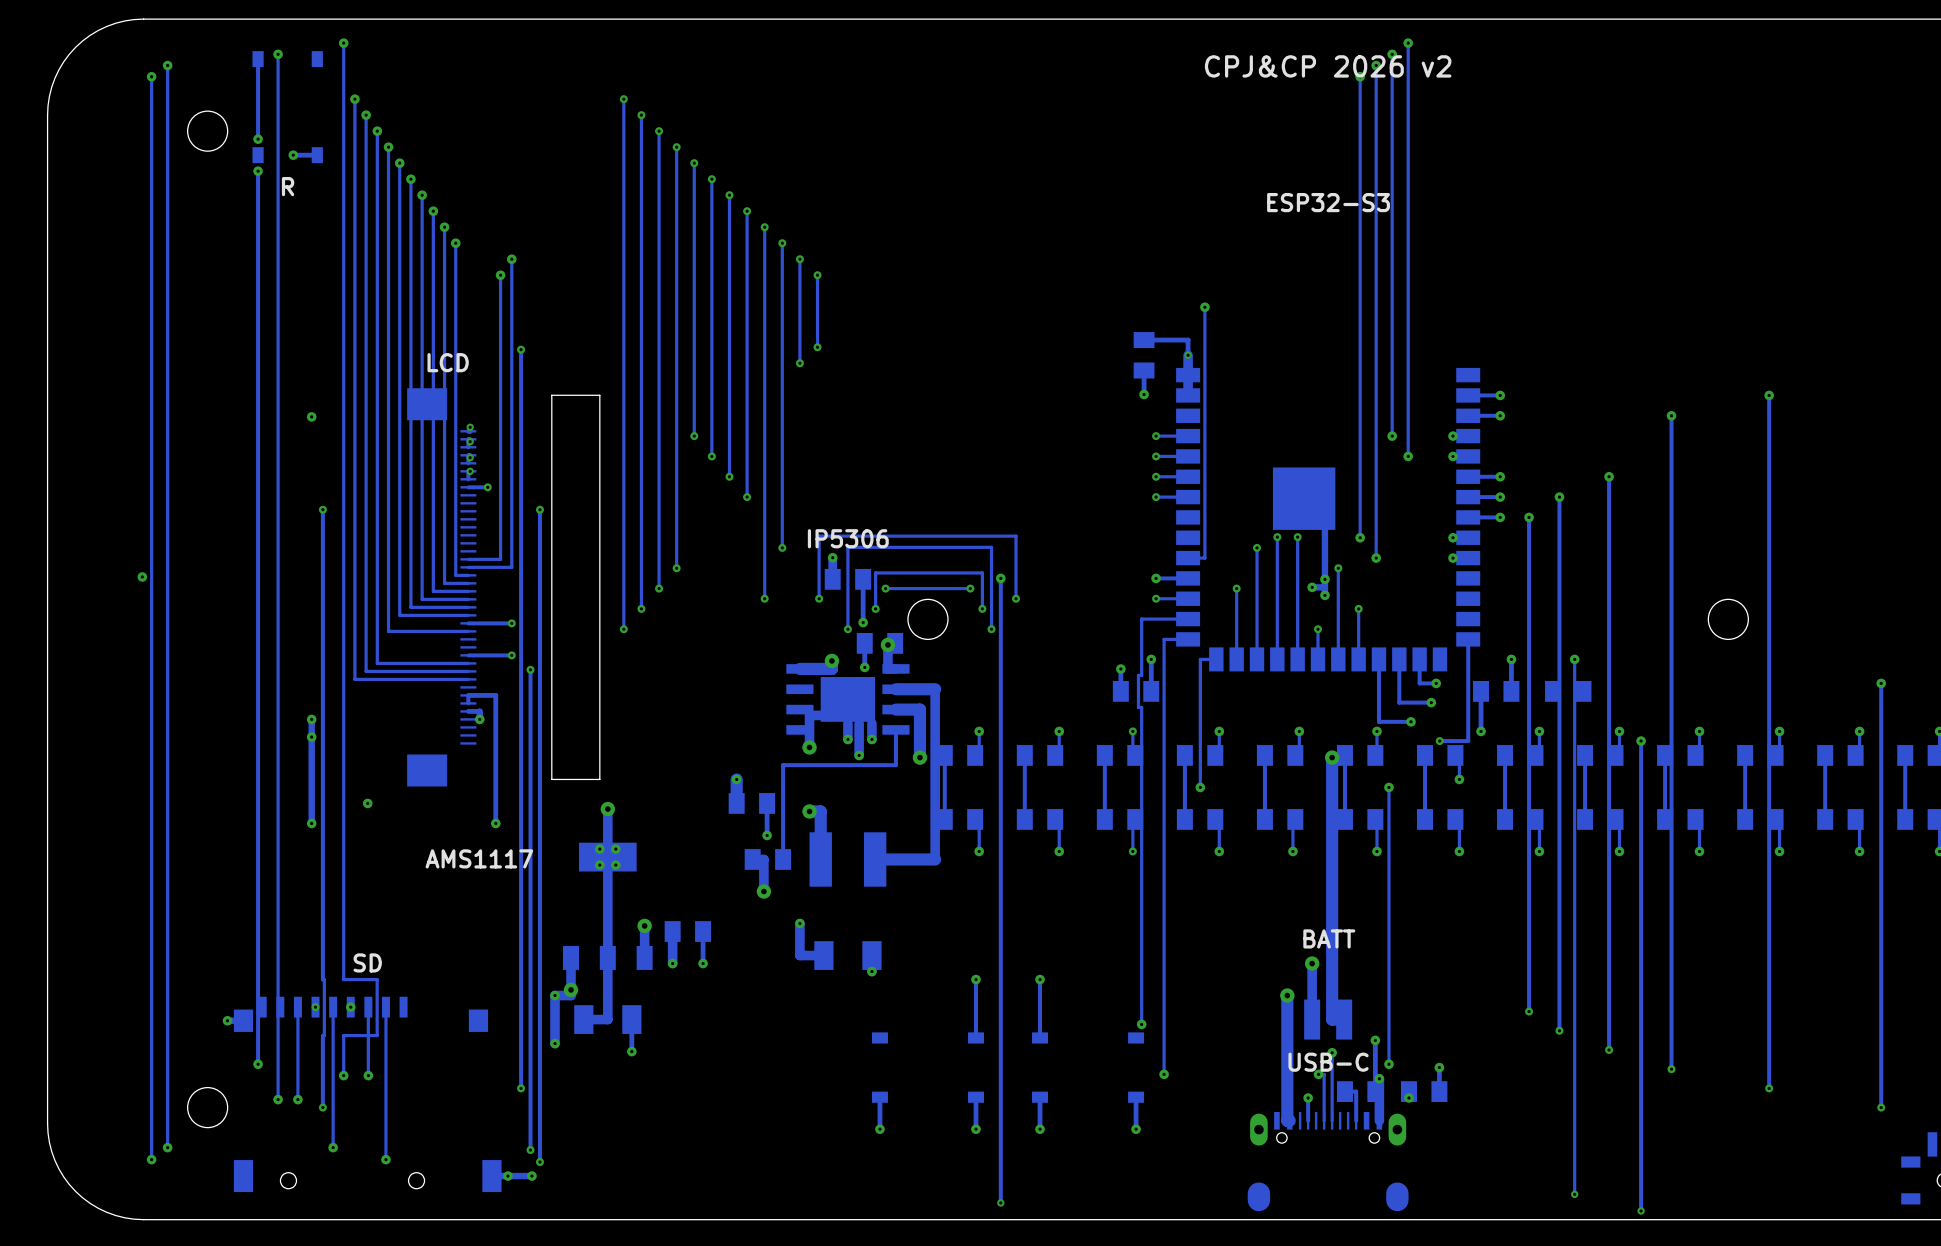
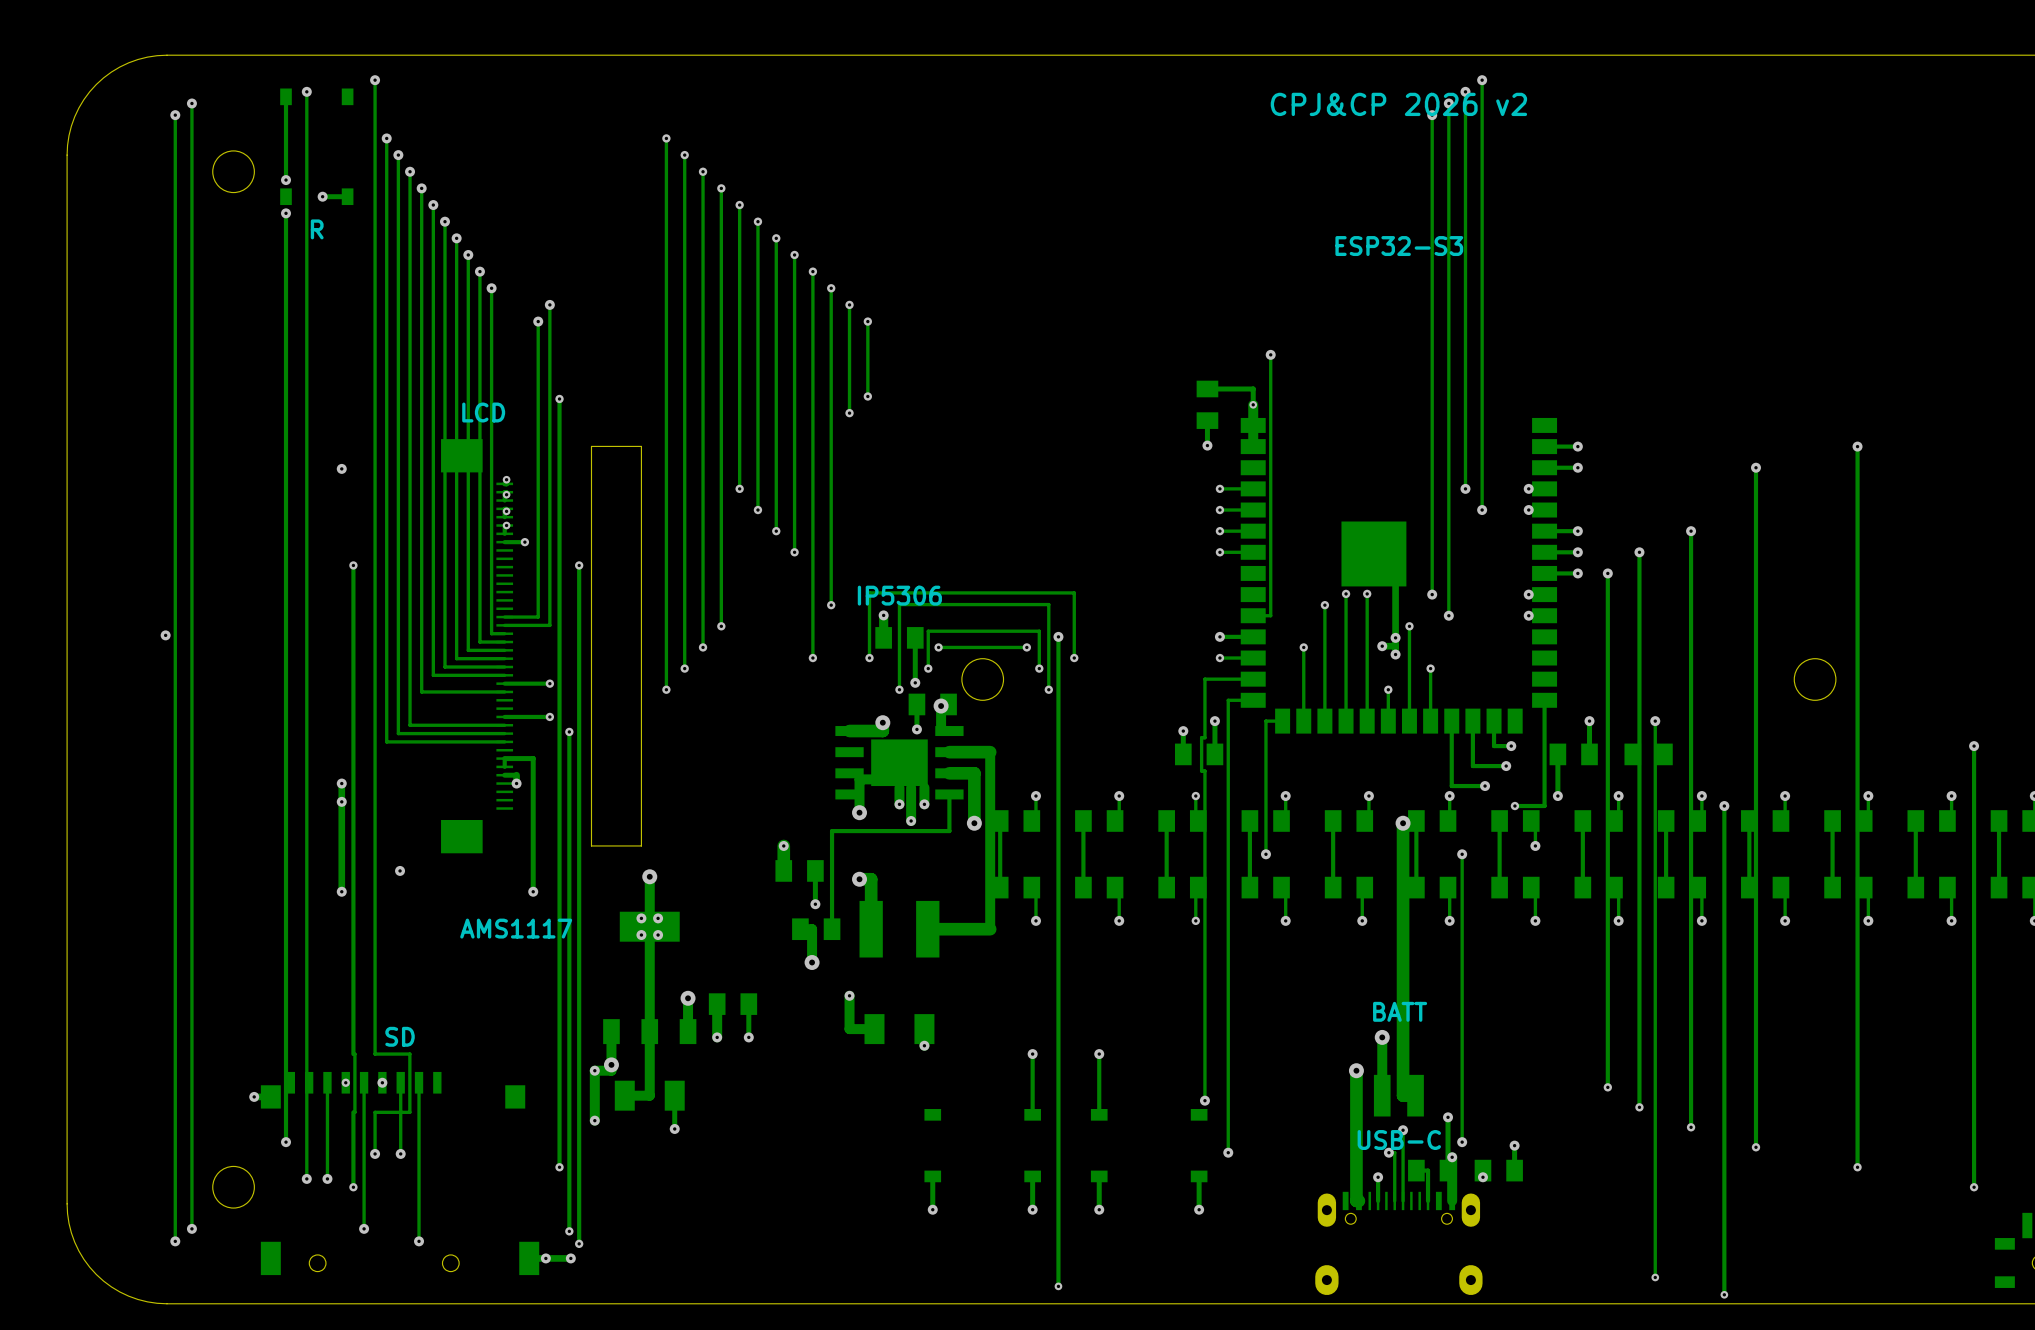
part footprint: [1247, 1112, 1409, 1212] -> [1315, 1191, 1483, 1296]

